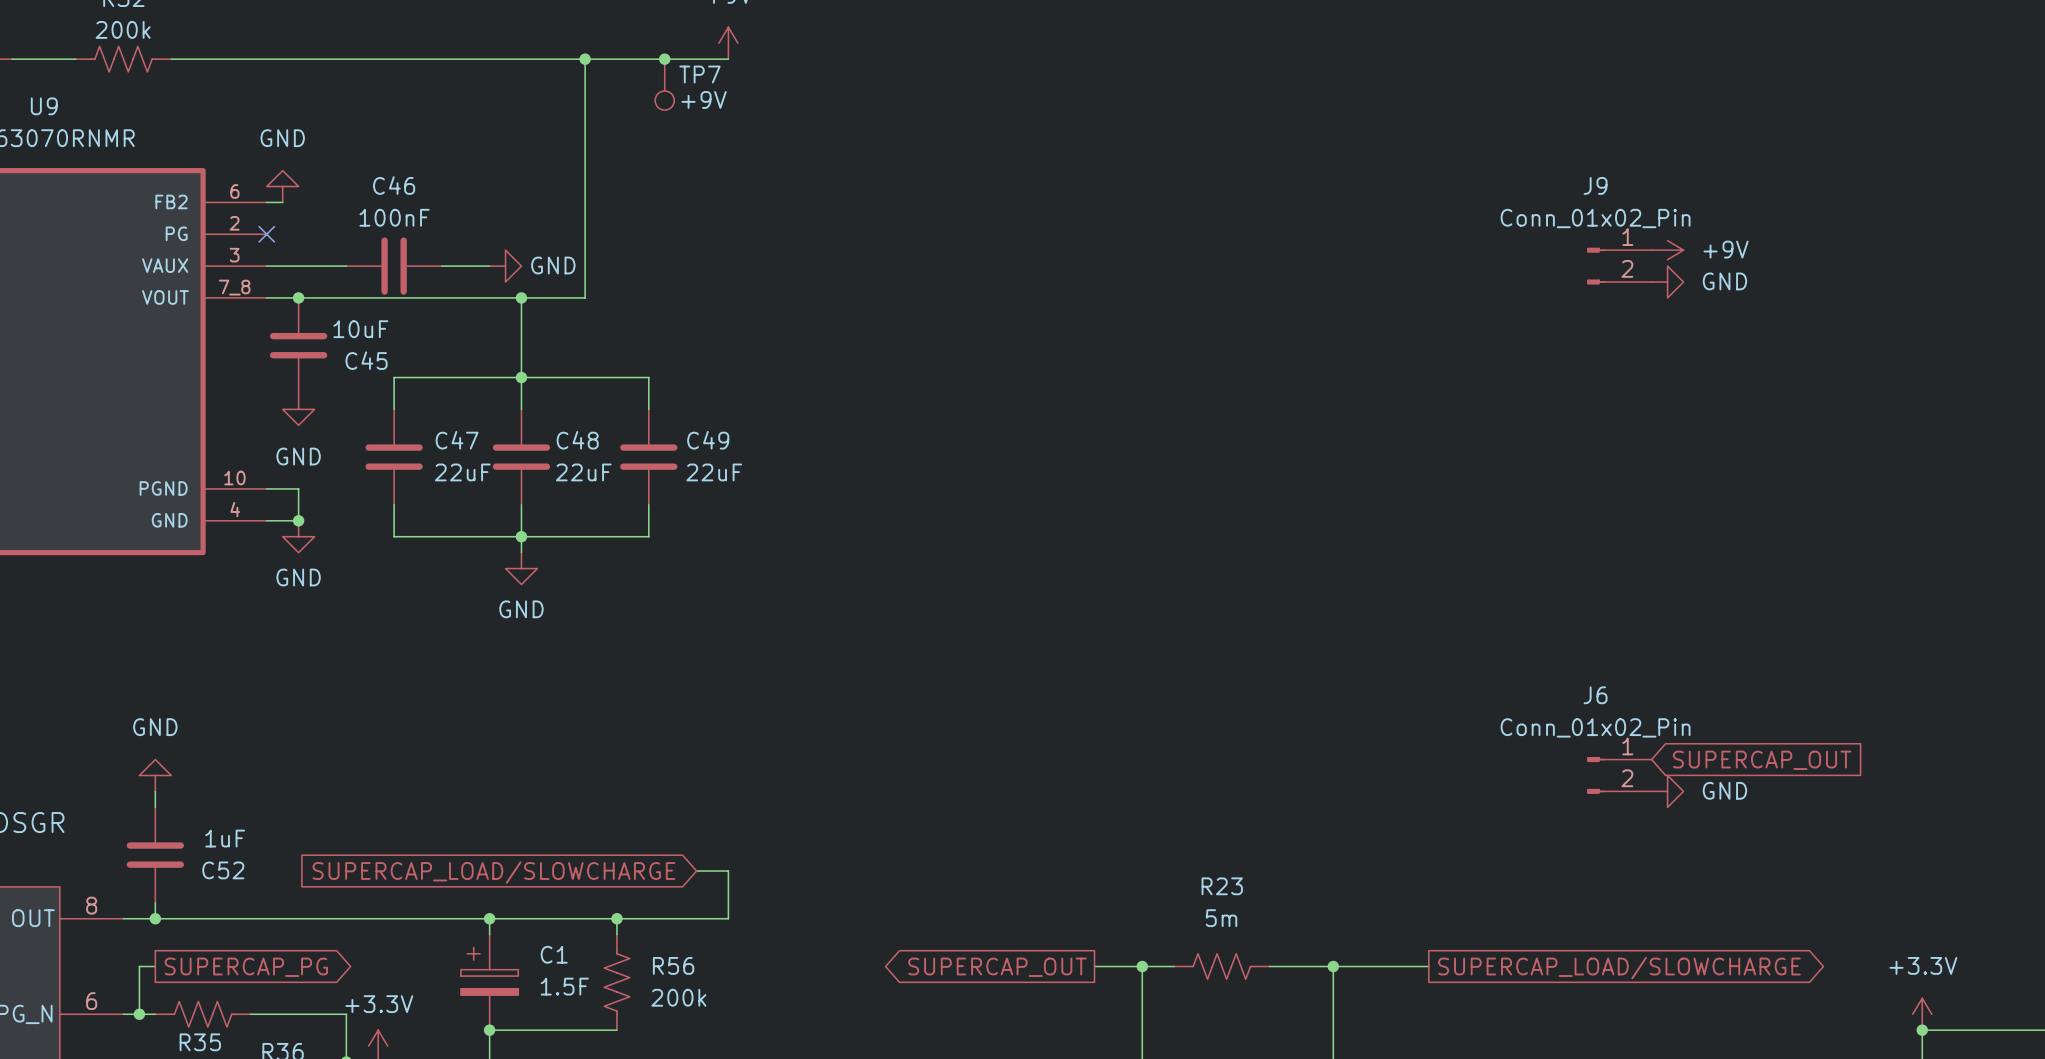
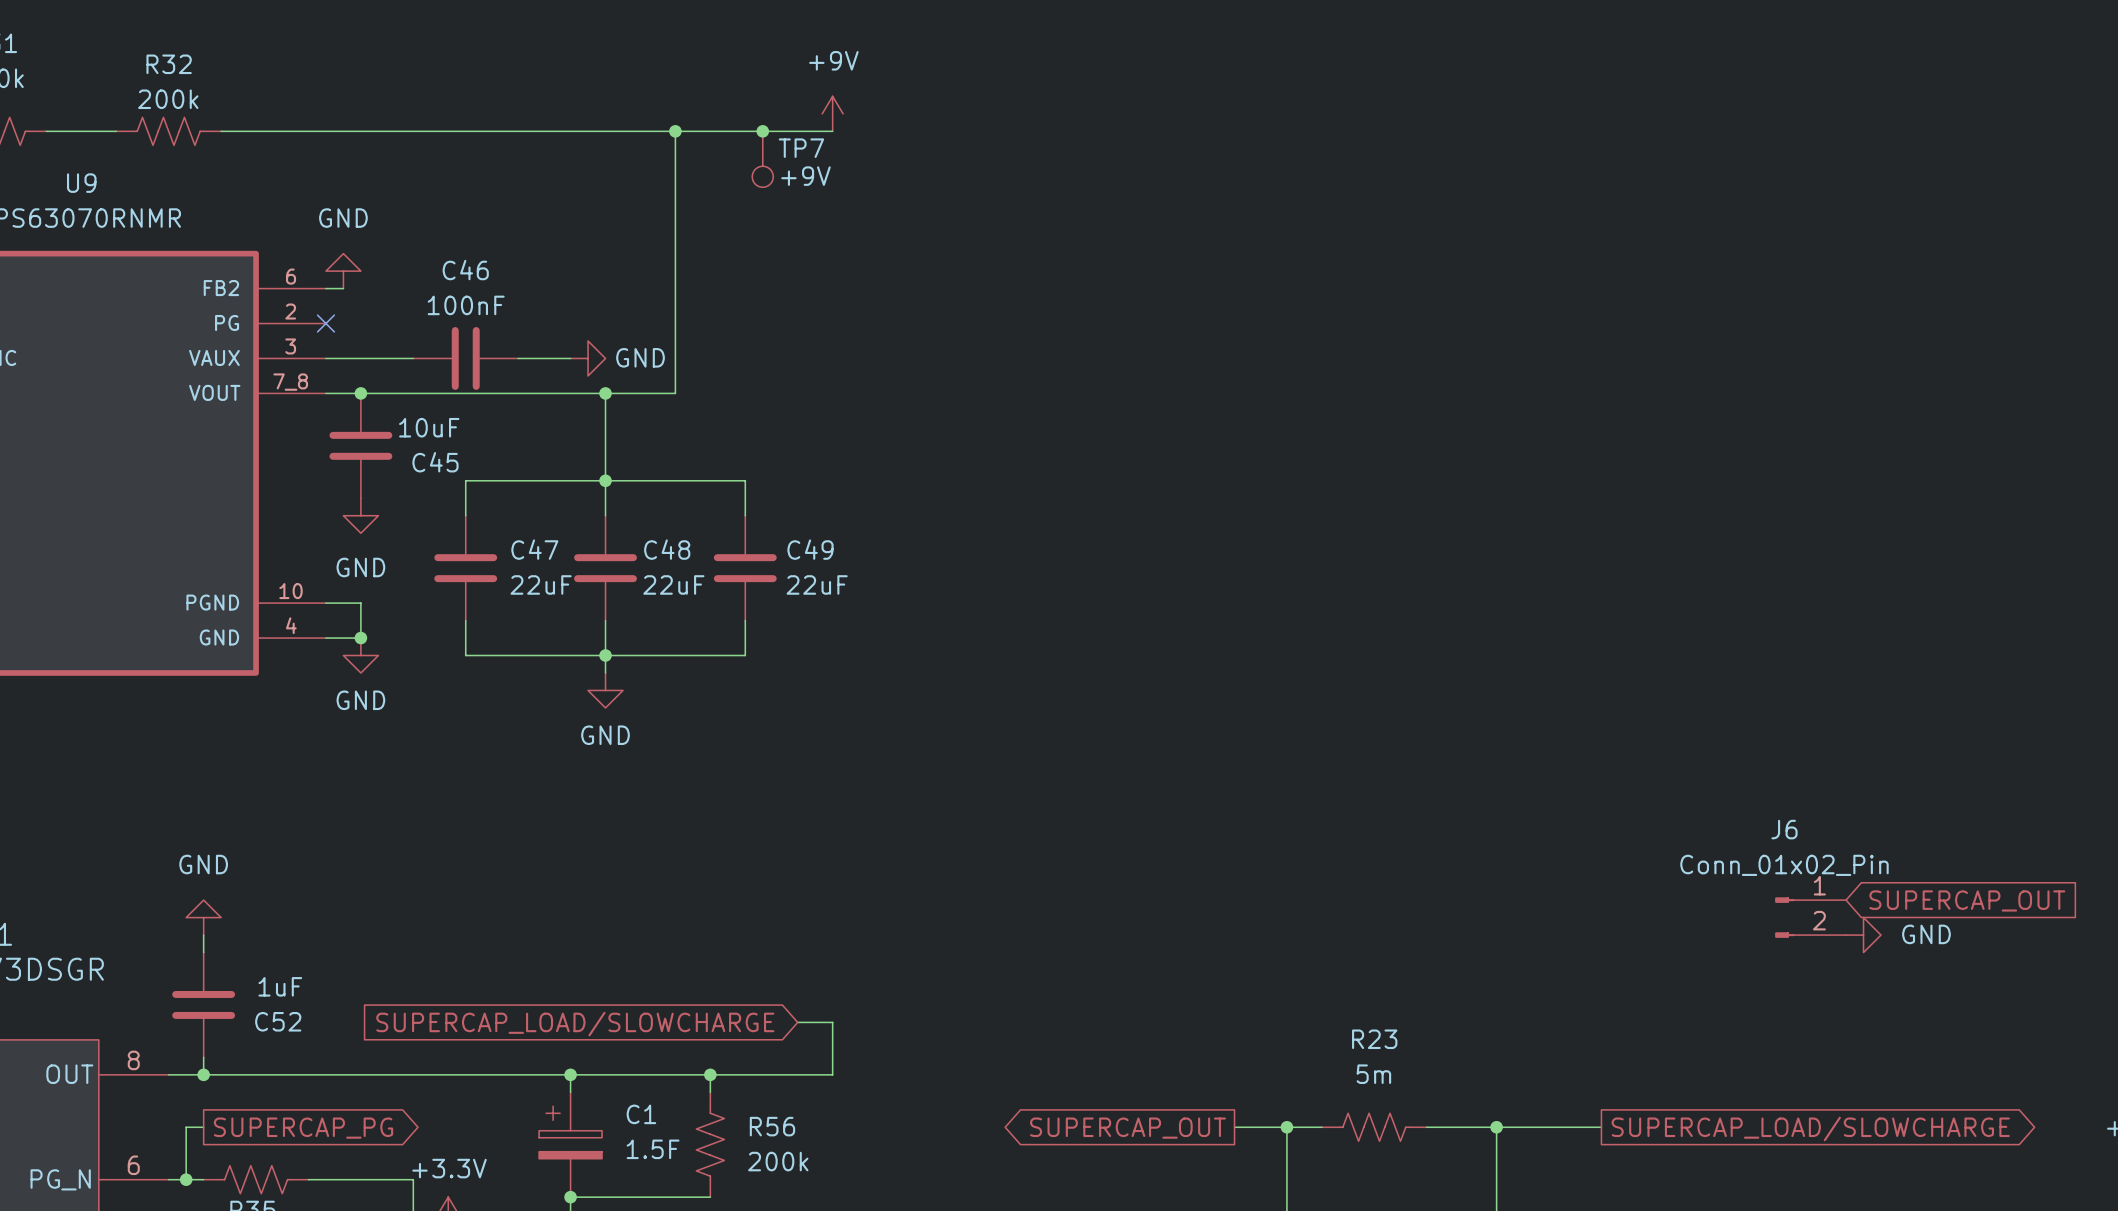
power symbol: +9V (1667, 250) -> none
J9: Conn_01x02_Pin (1619, 266) -> none
power symbol: GND (1667, 282) -> none

